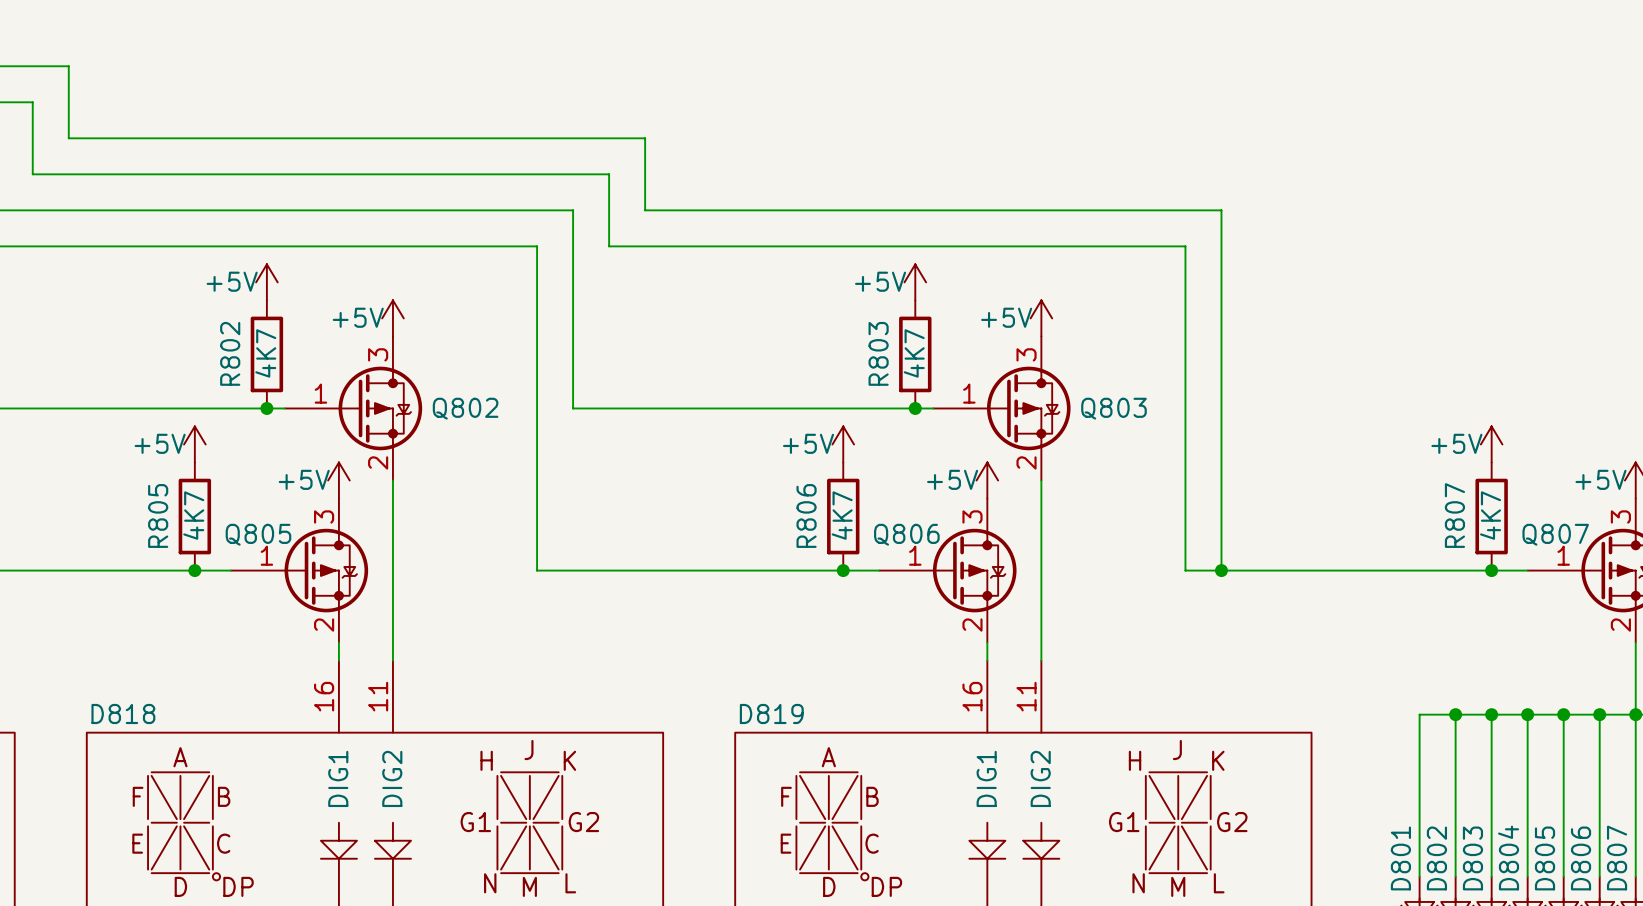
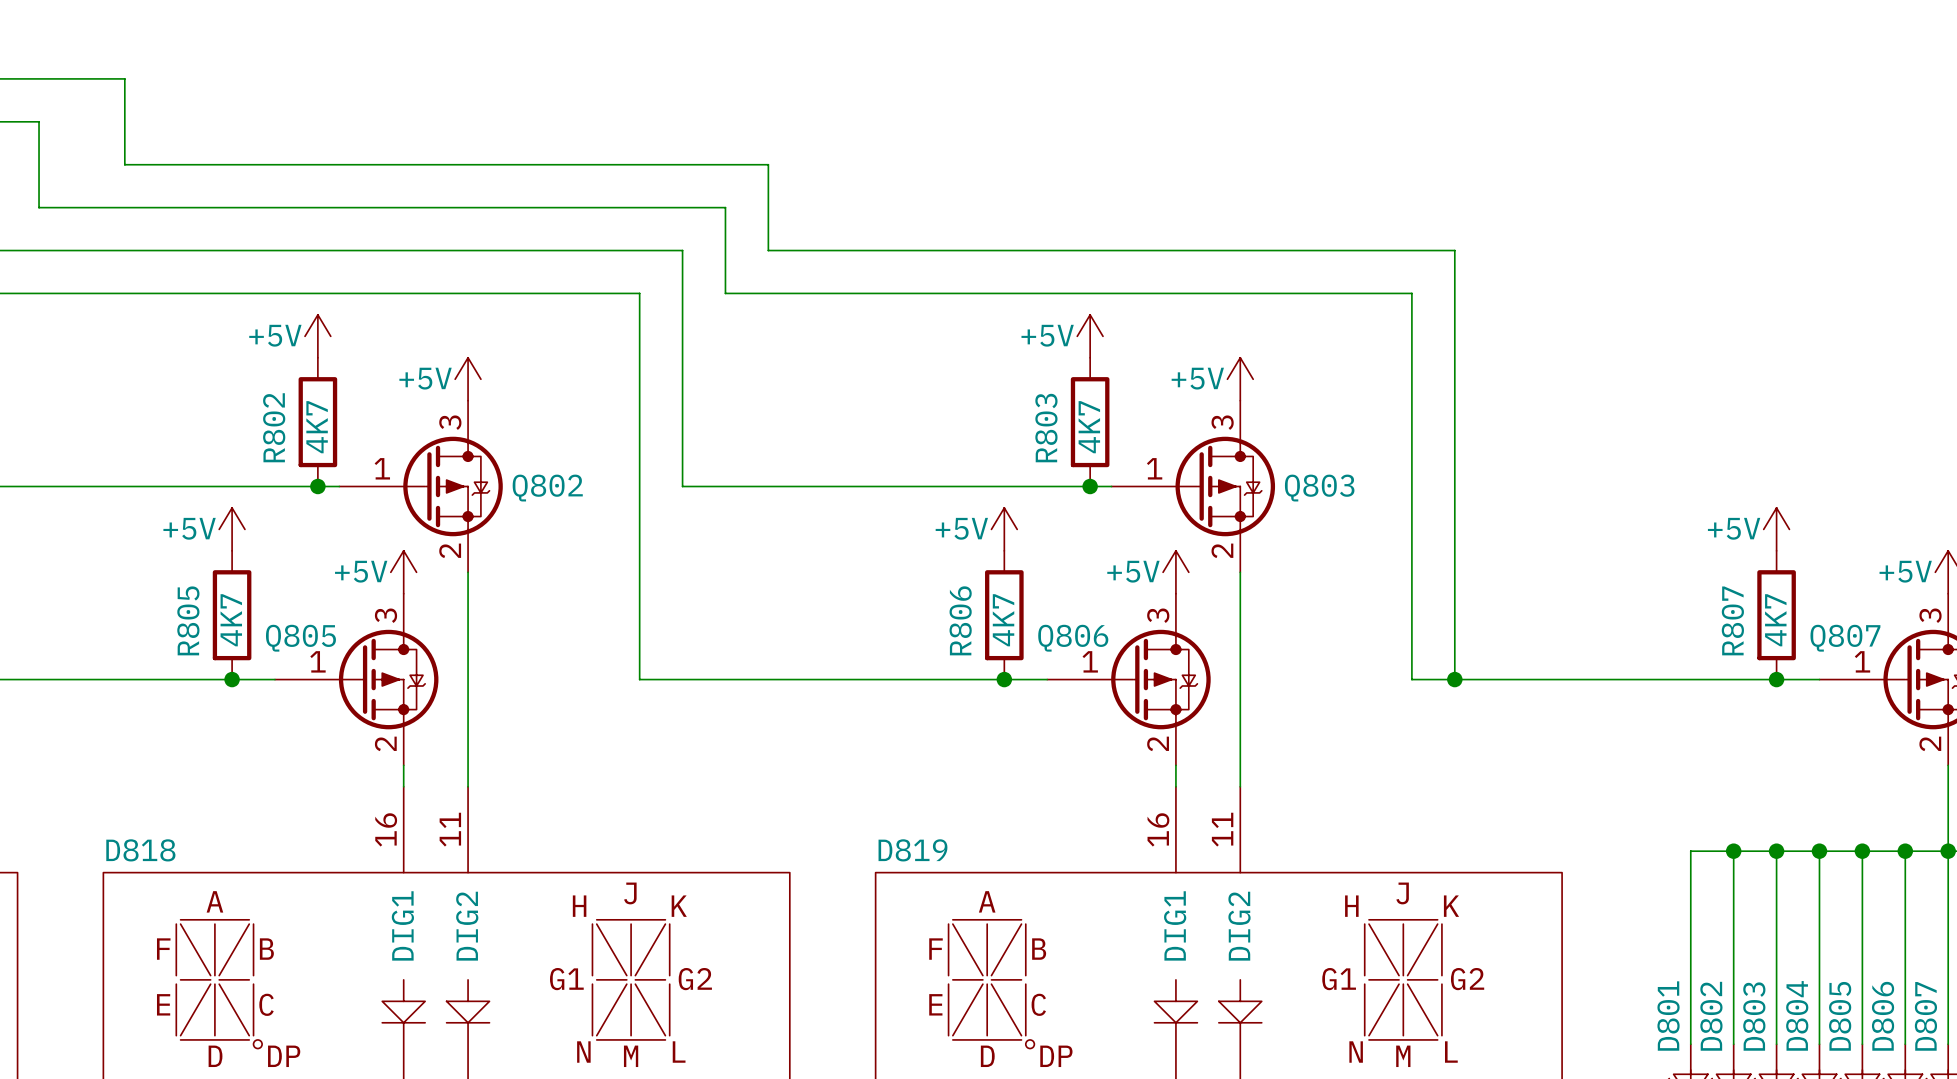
wire: (68, 66) (68, 138) (104, 138) -> (81, 78) (124, 78) (124, 164)

